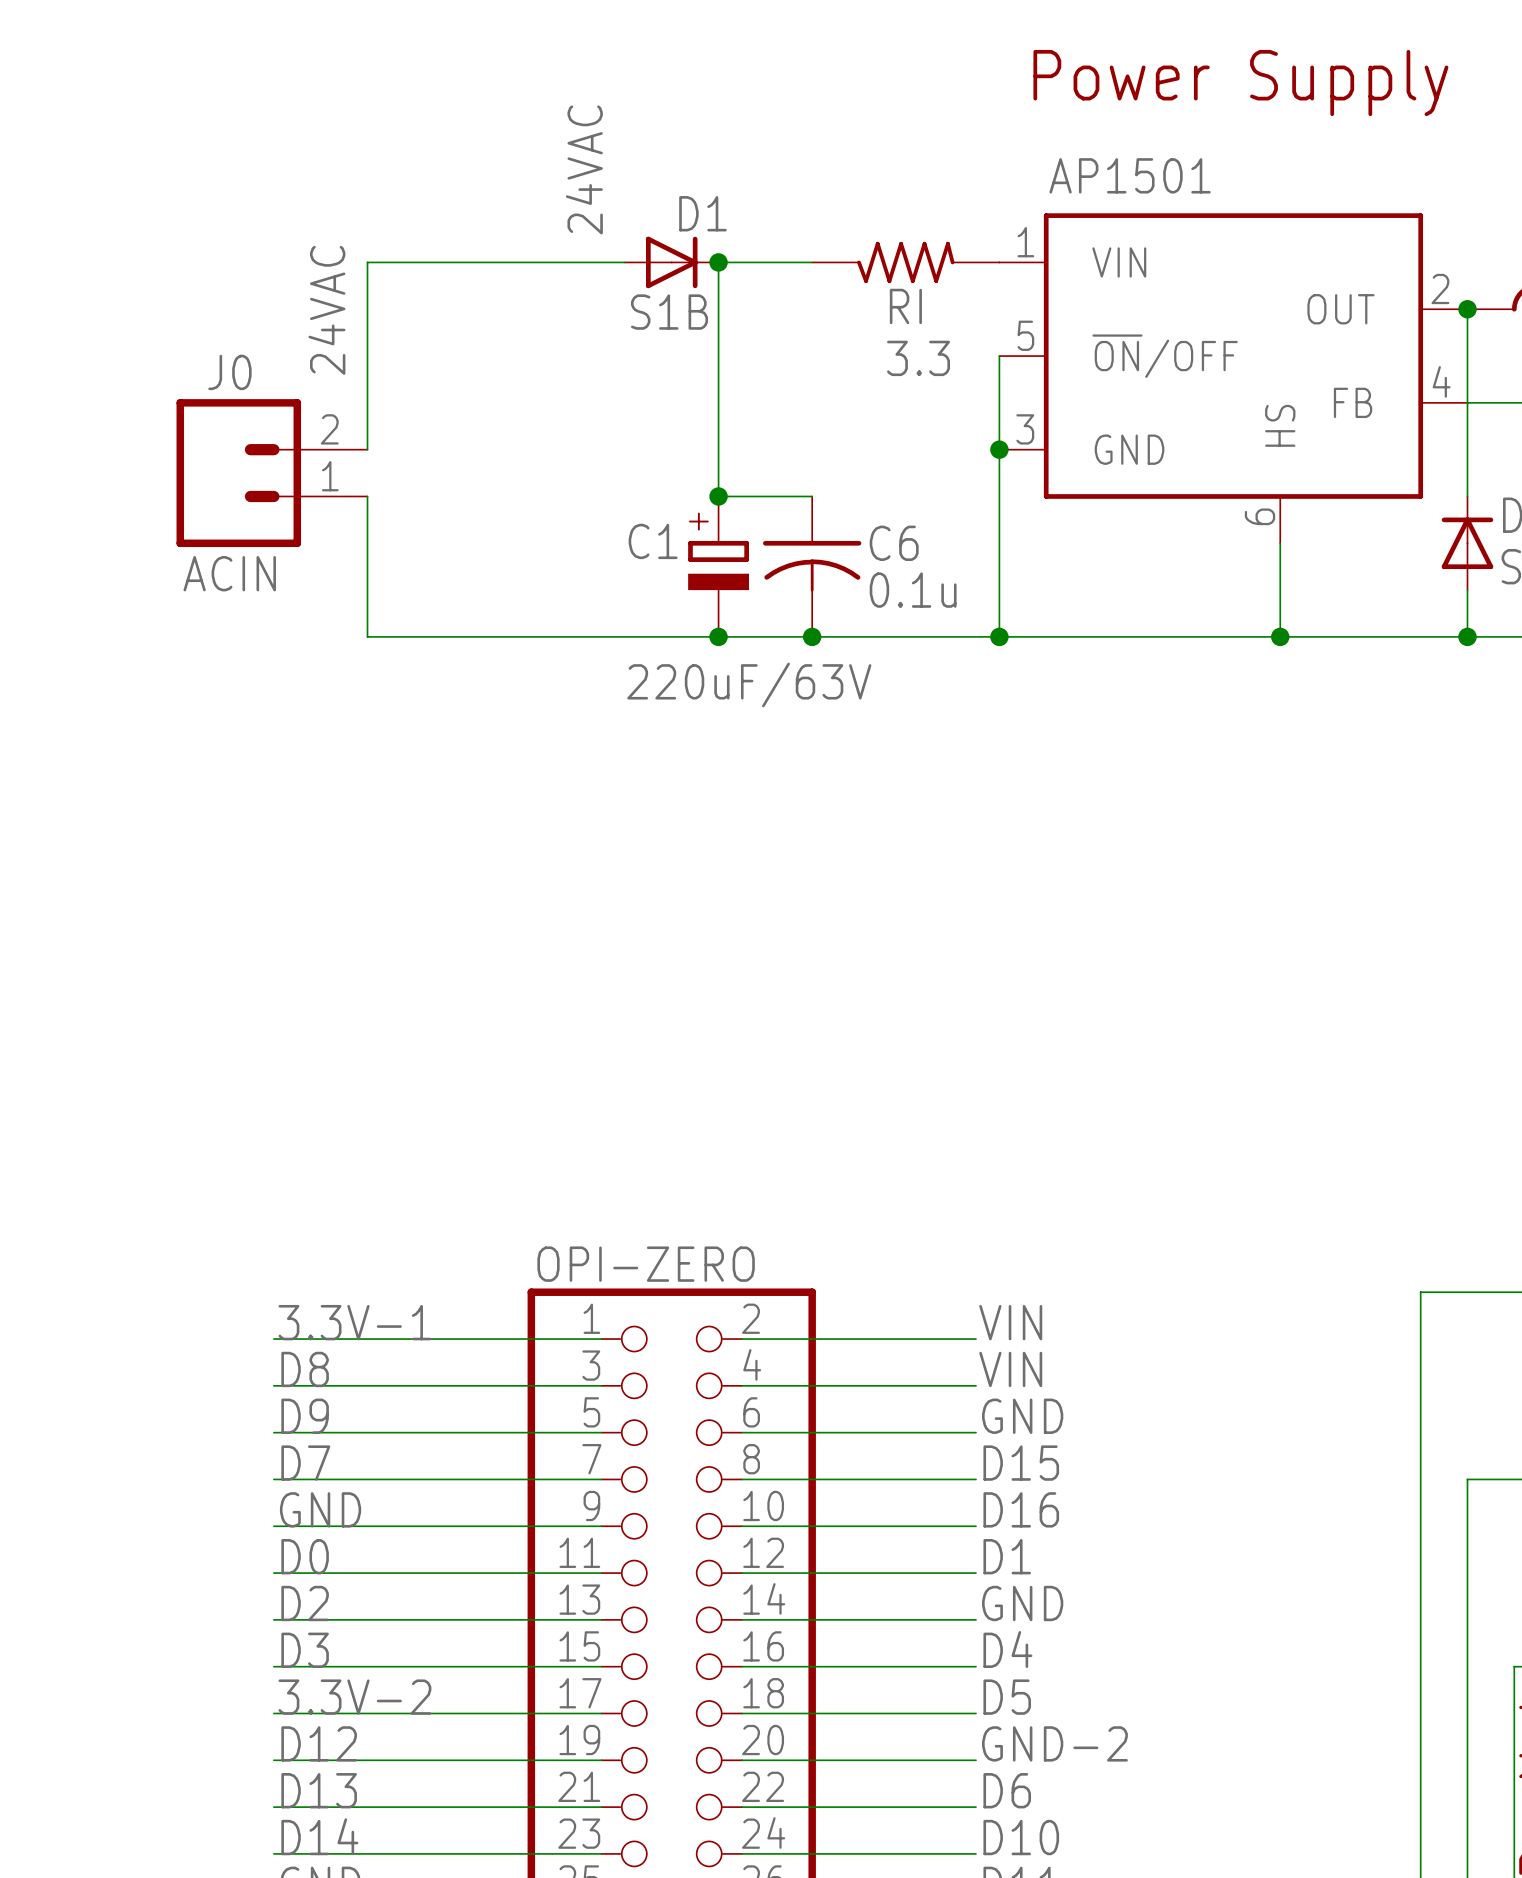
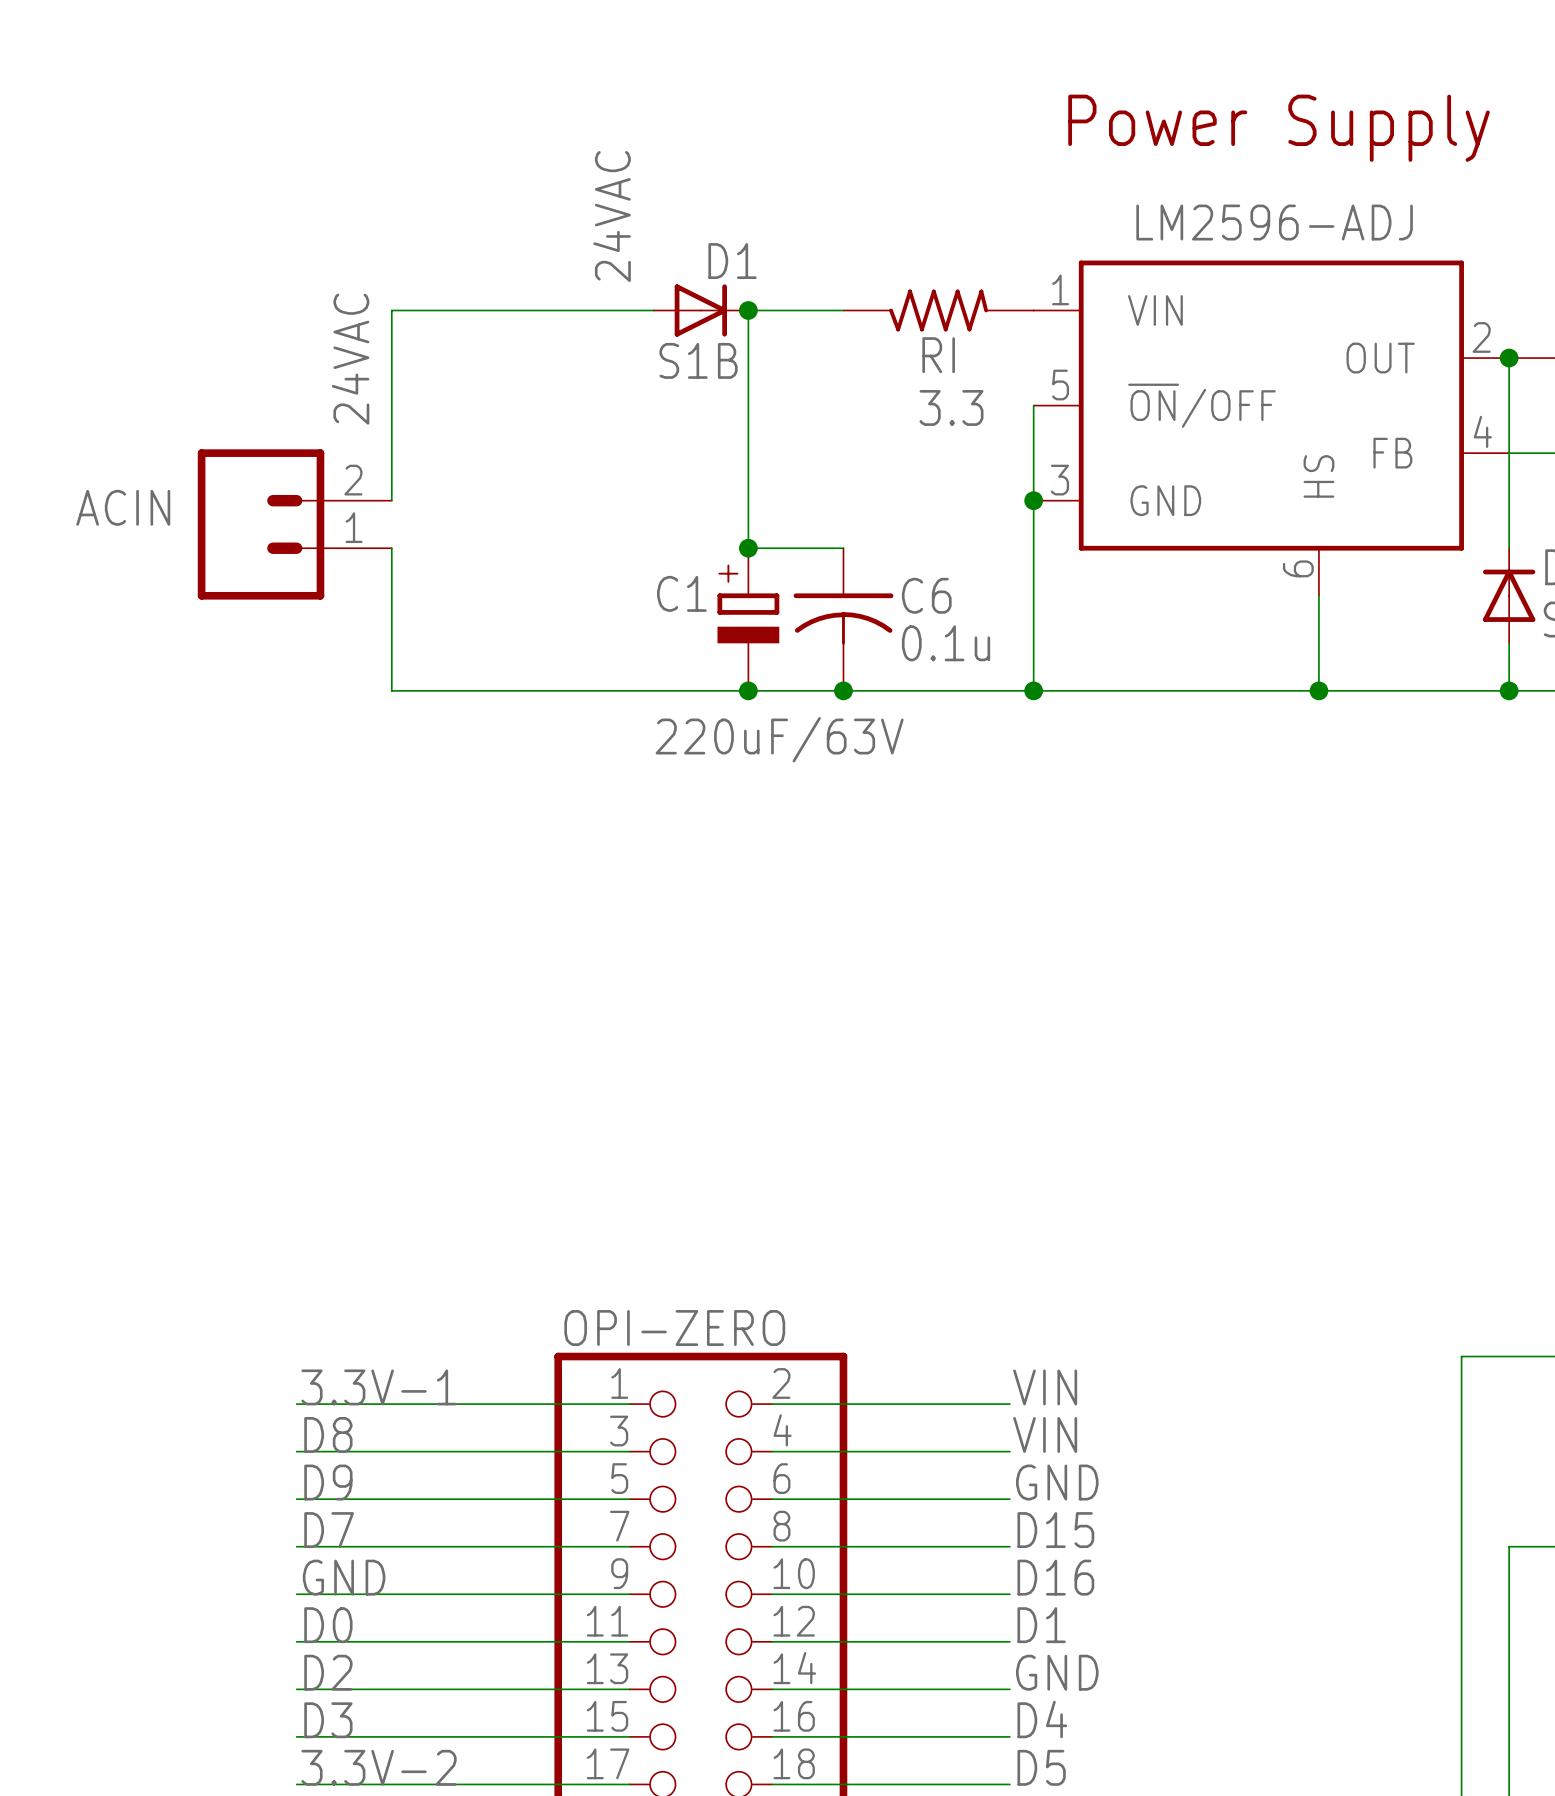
AP1501 name: AP1501 (1130, 175) -> LM2596-ADJ (1274, 222)
J0 name: J0 (229, 372) -> ACIN (123, 507)
J0 value: ACIN (229, 573) -> none

